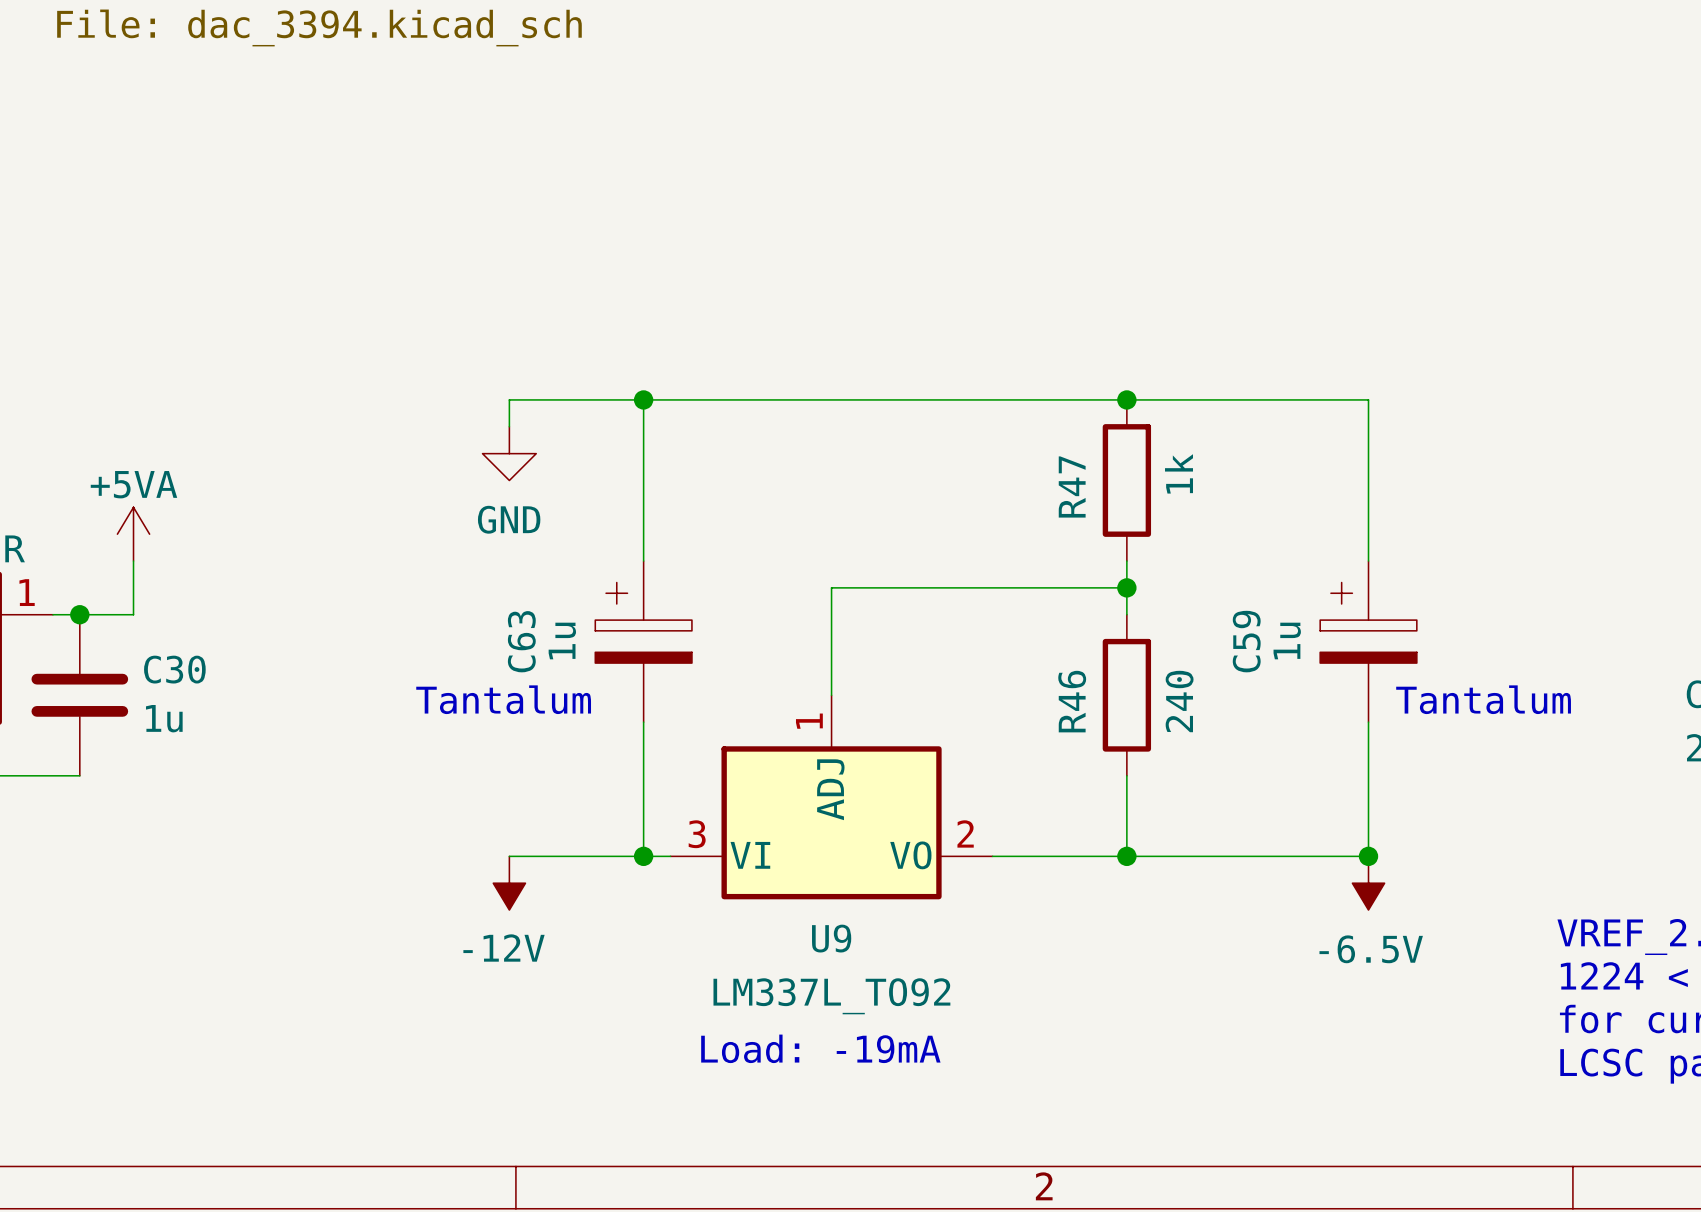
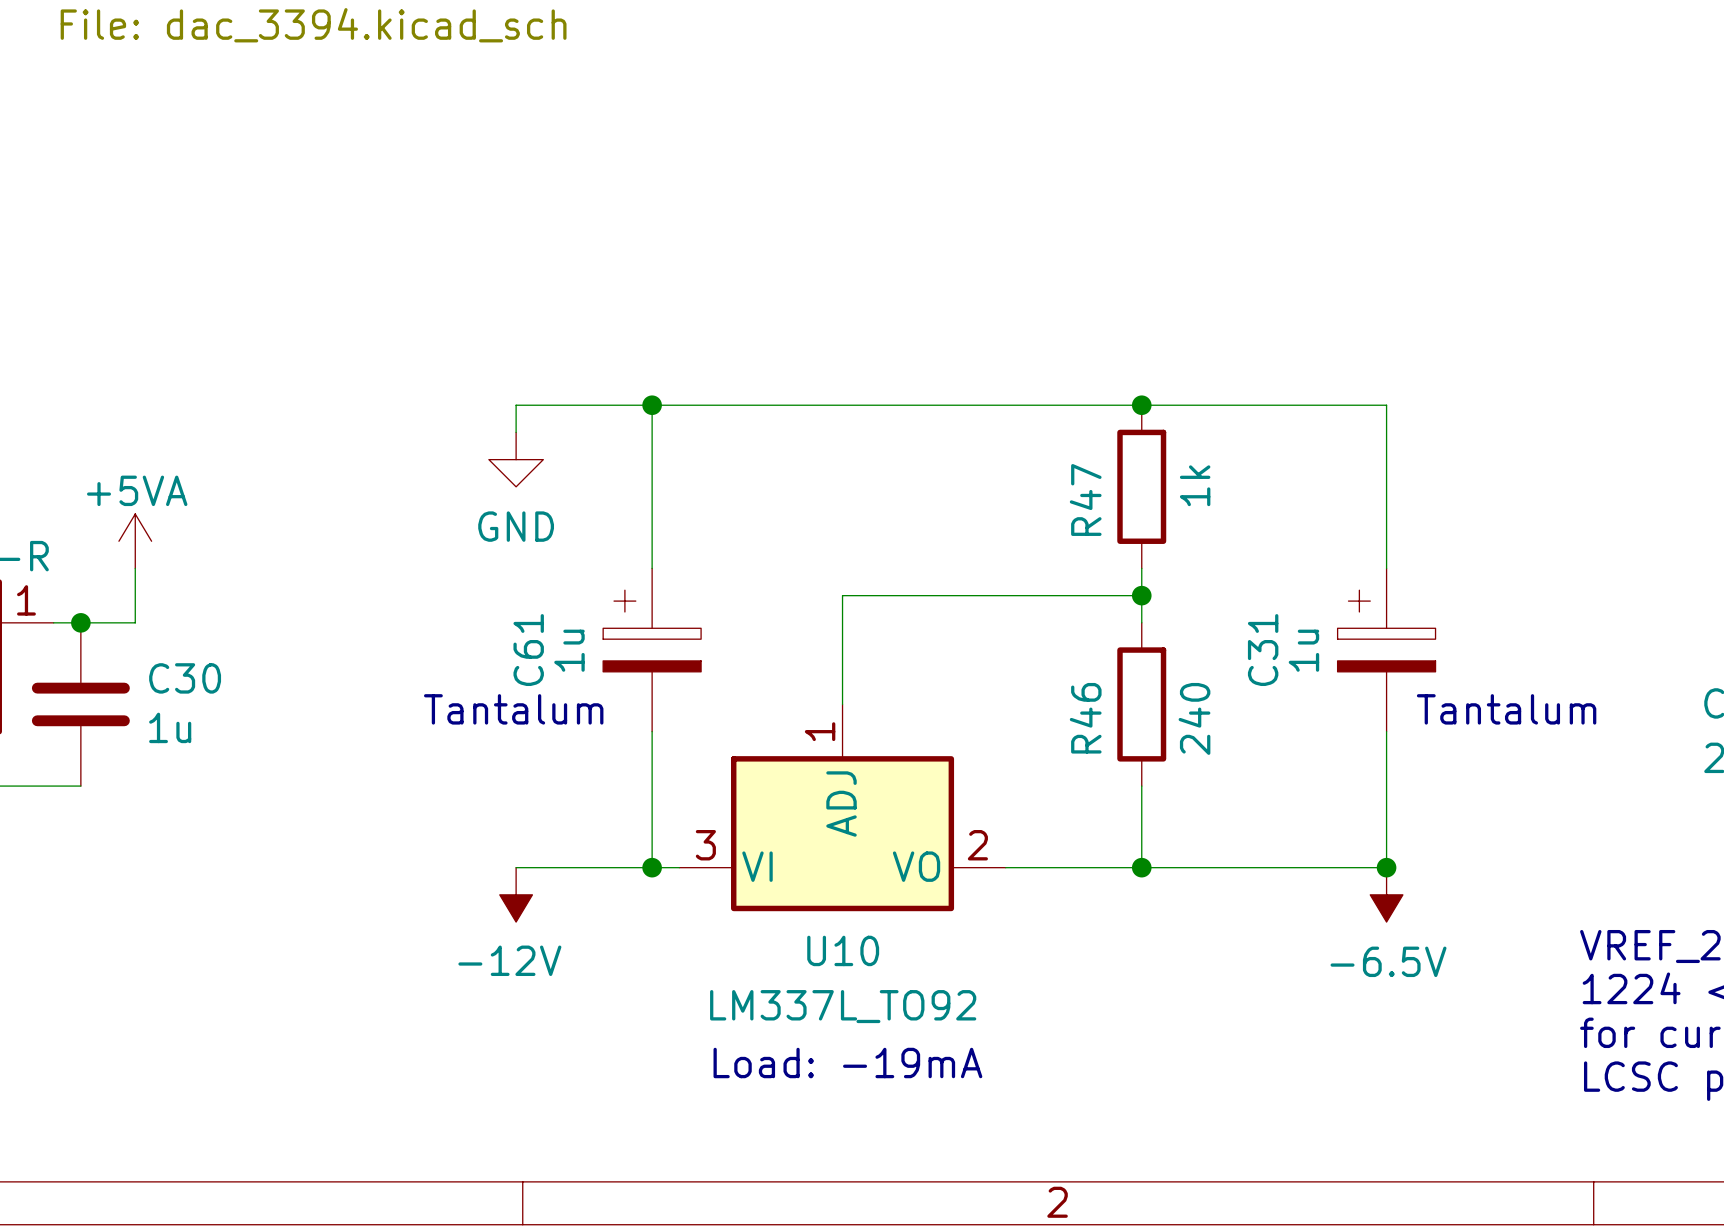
C63 name: C63 (521, 641) -> C61 (528, 650)
C59 name: C59 (1246, 641) -> C31 (1263, 650)
U9 name: U9 (831, 938) -> U10 (843, 950)

